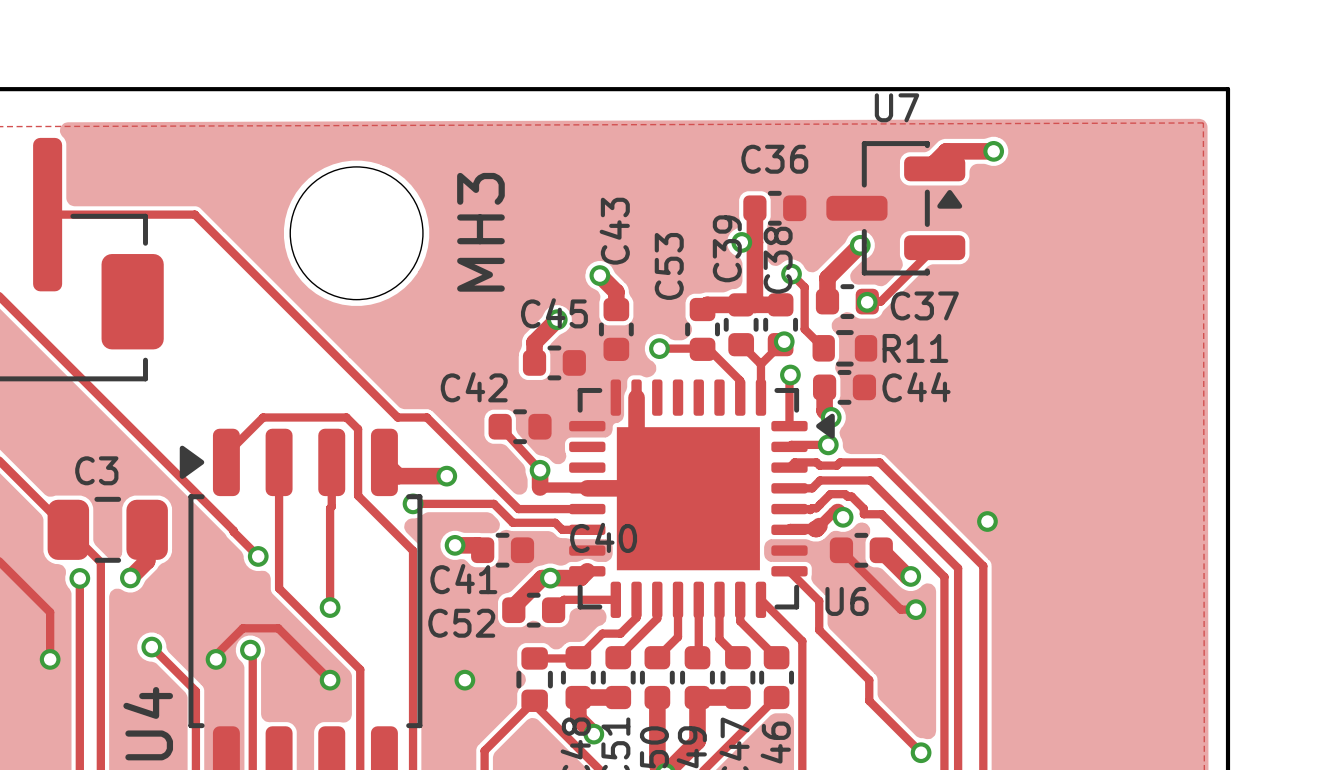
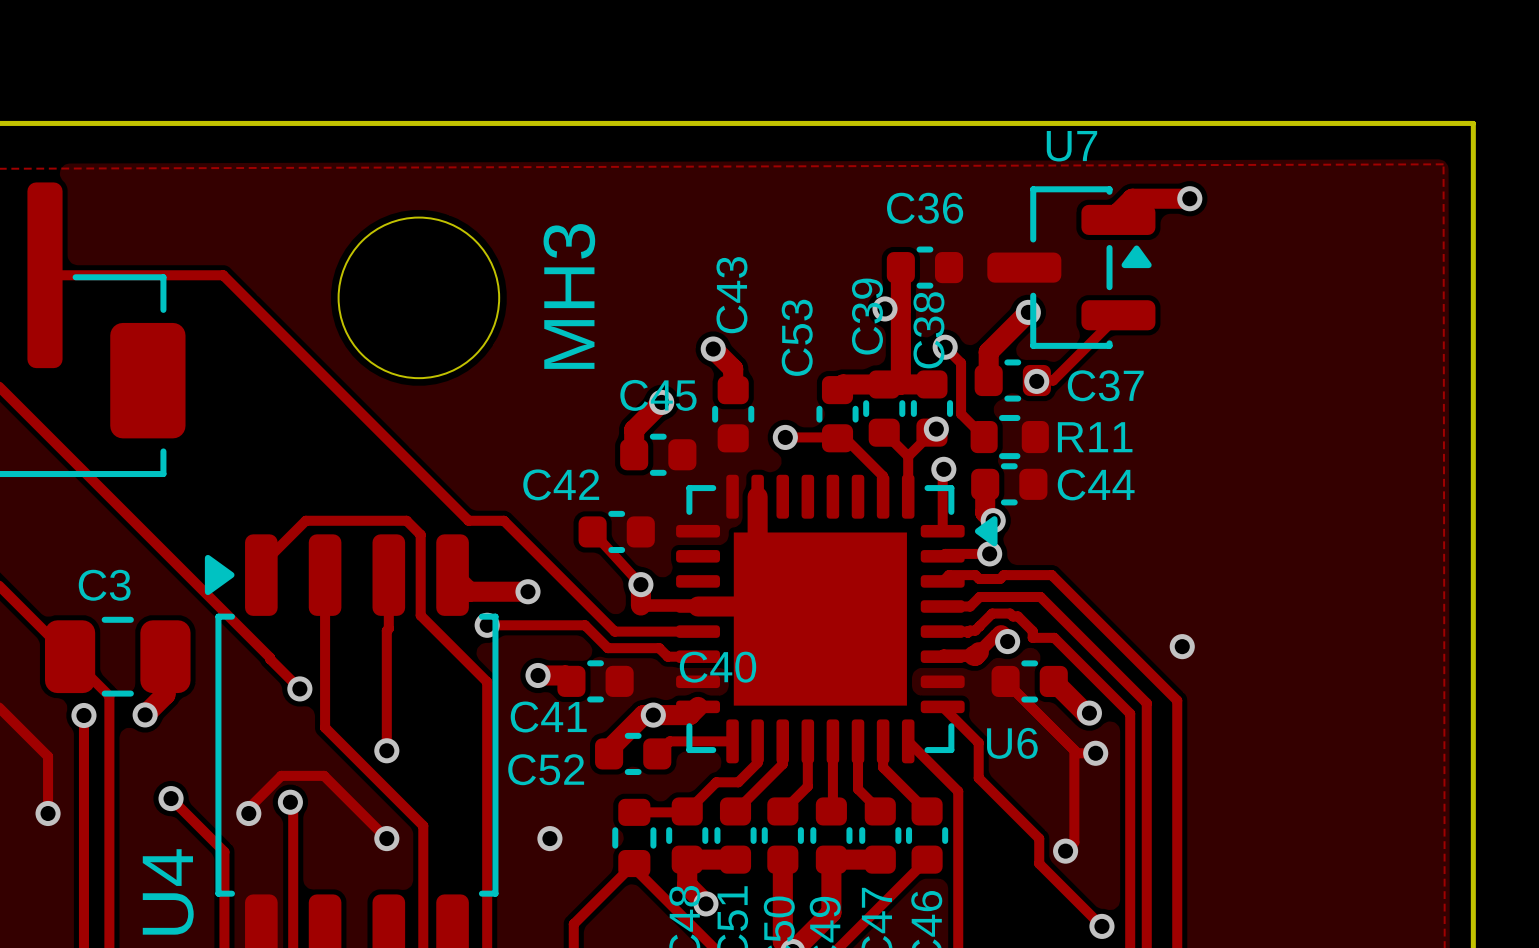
track: none -> (1074, 750) (1074, 842) (1065, 851)
via: none -> (1065, 851)

